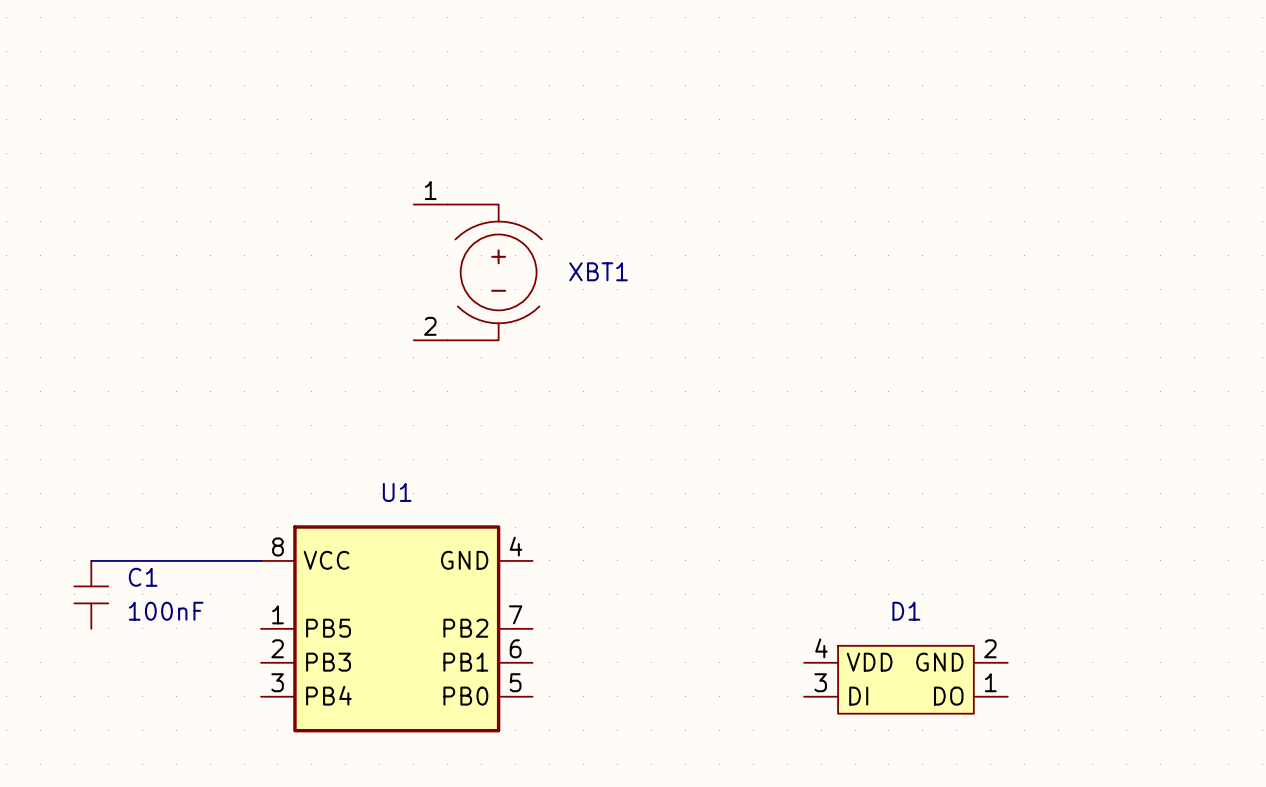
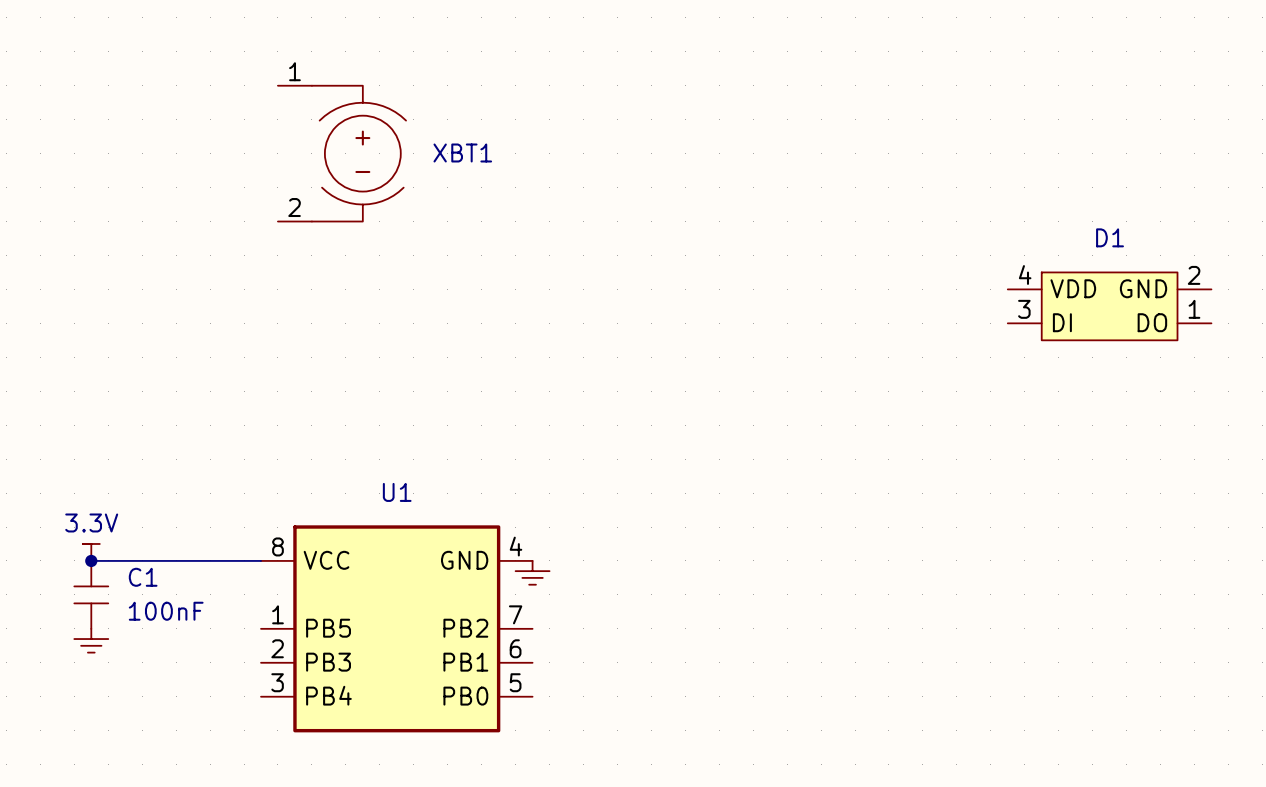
XBT1 position: (477, 272) -> (342, 153)
power symbol: none -> 3.3V (91, 552)
junction: none -> (91, 560)
power symbol: none -> (532, 572)
power symbol: none -> (91, 640)
D1 position: (905, 679) -> (1109, 306)

